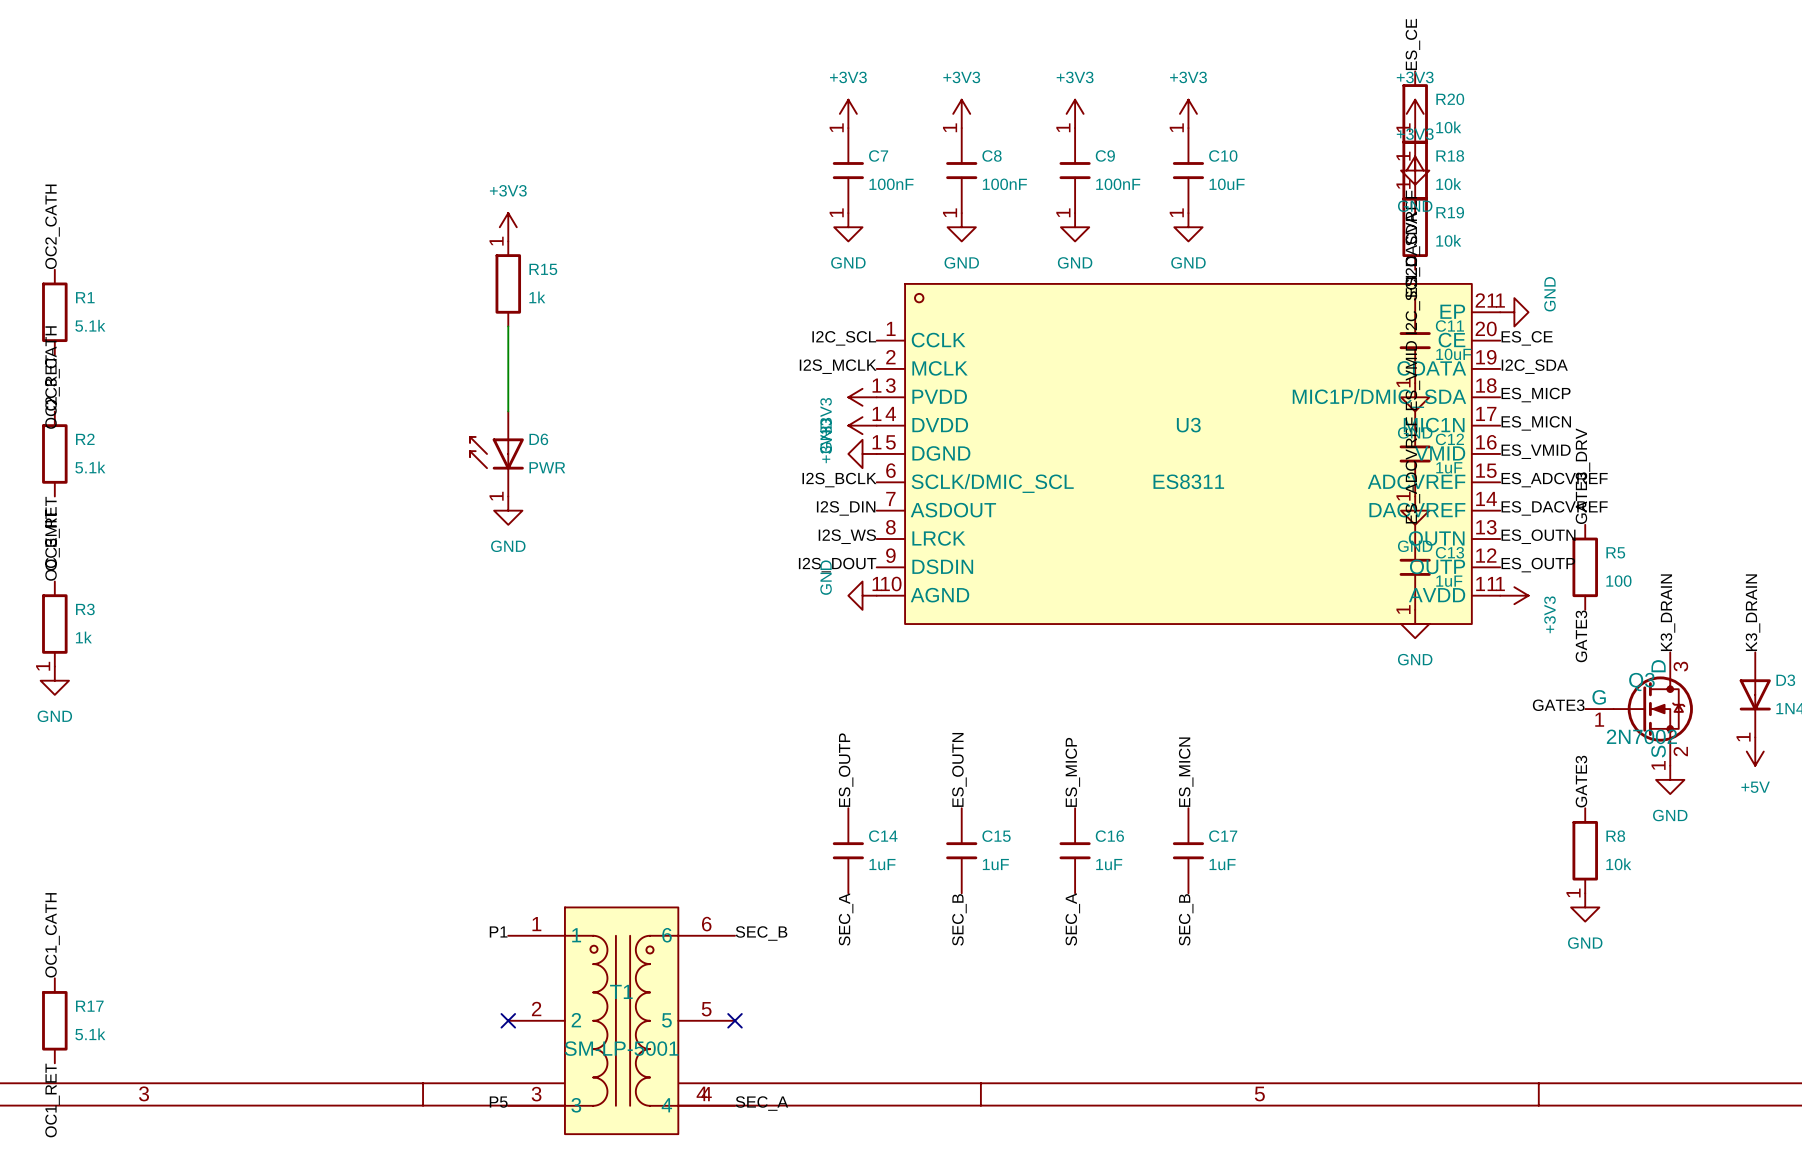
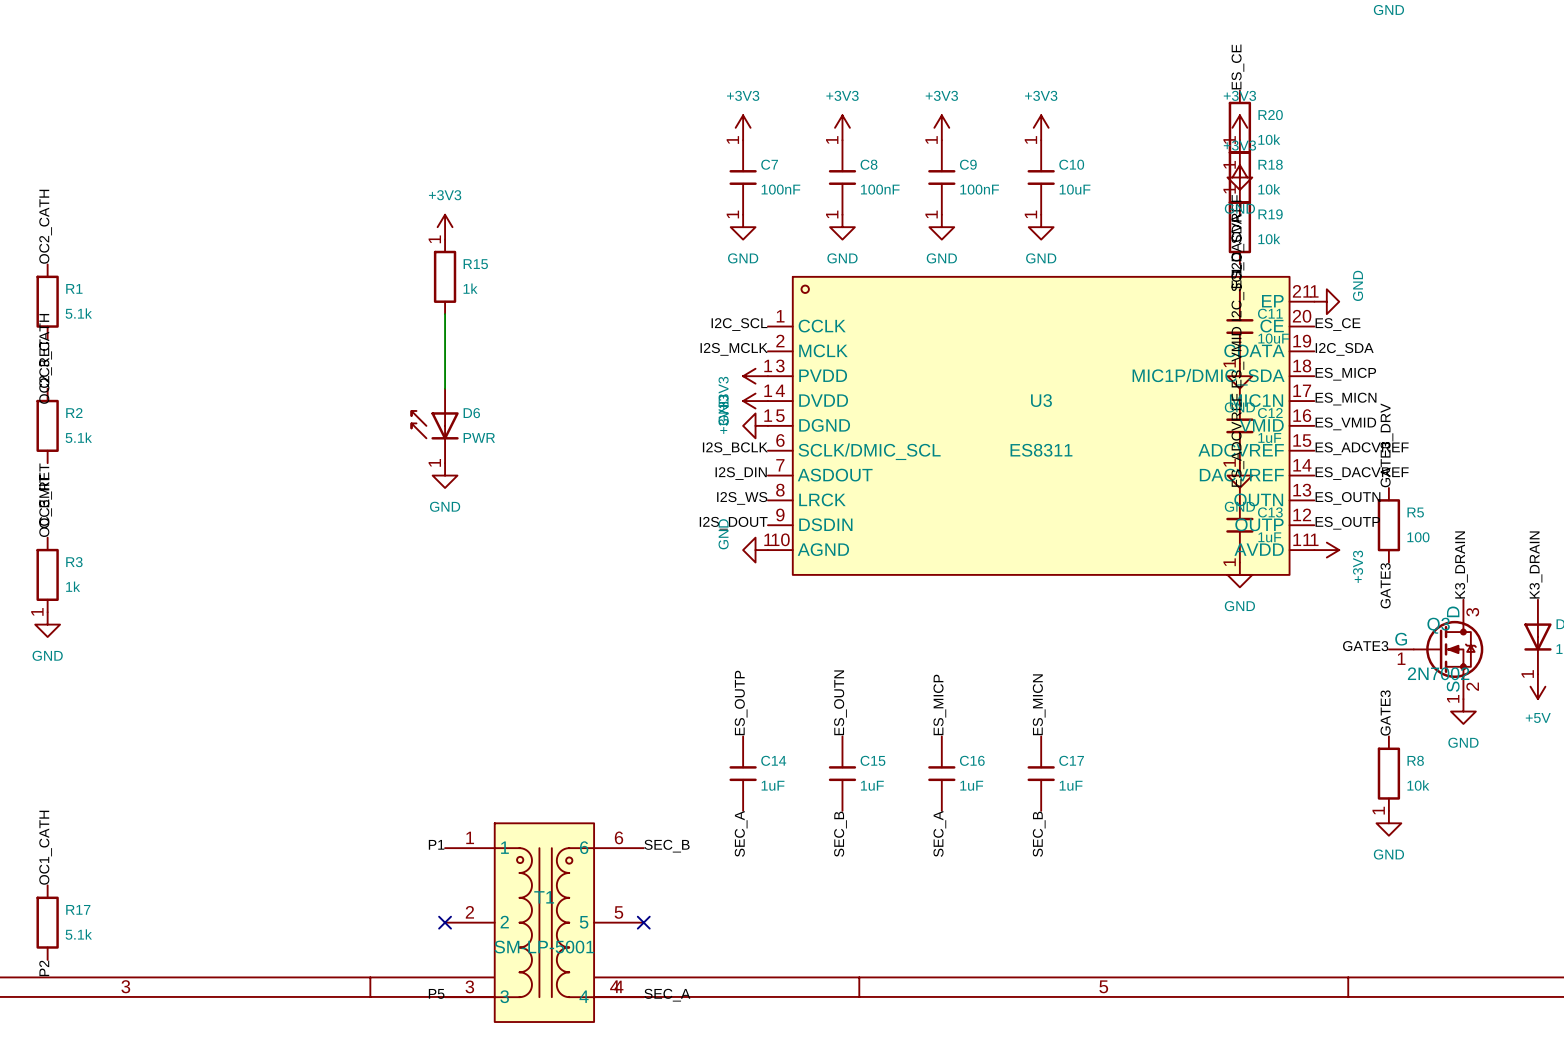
label: OC1_RET (52, 1100) -> P2 (44, 968)

